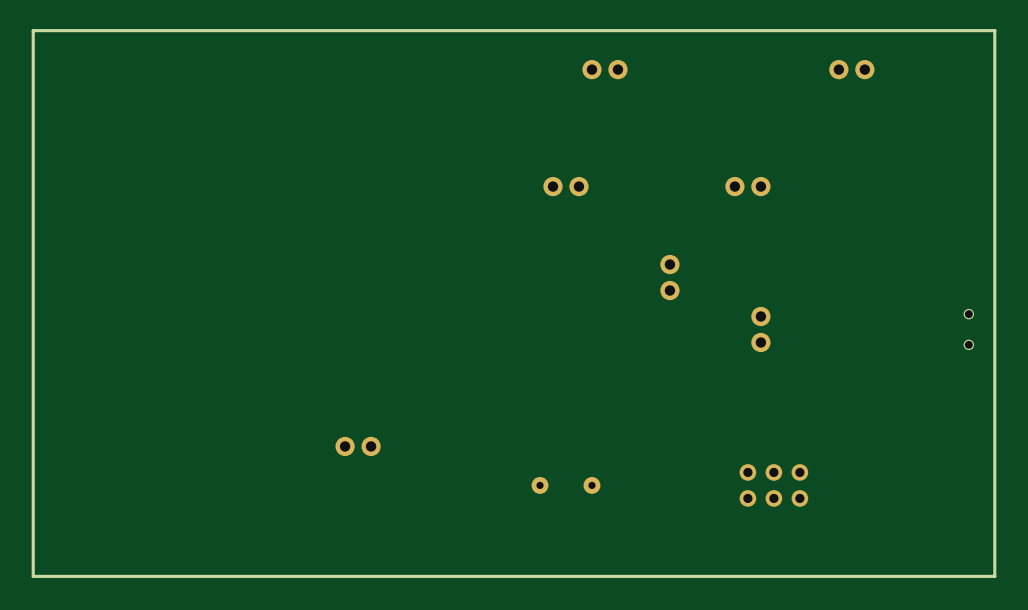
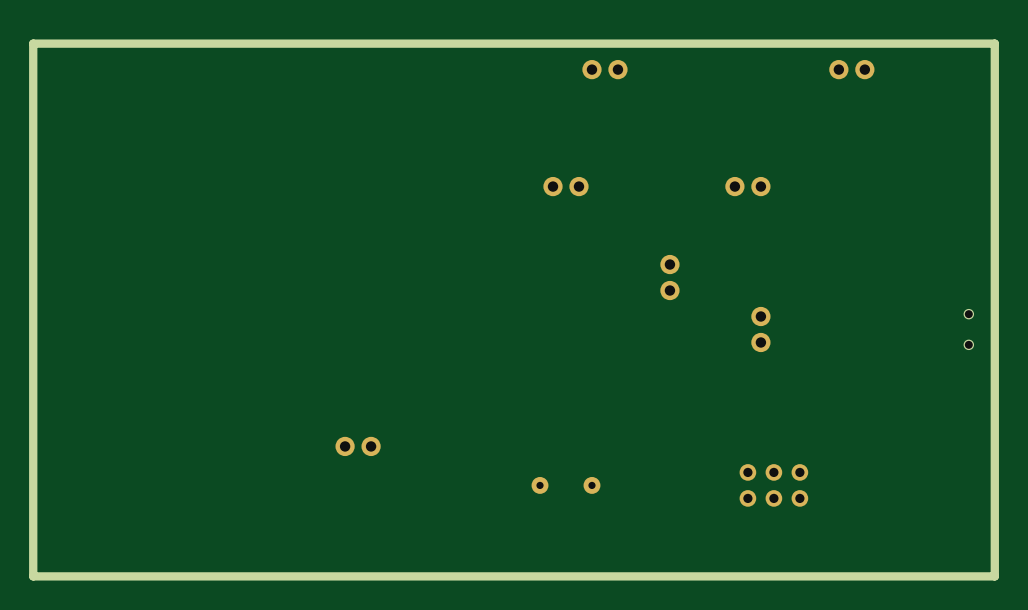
board edge: (994, 43) (994, 30) (33, 30) (33, 43) -> (994, 43) (33, 43)
board edge width: thin (994, 43) (994, 576) (33, 576) (33, 43) -> thick (994, 43) (994, 576) (33, 576) (33, 43)

